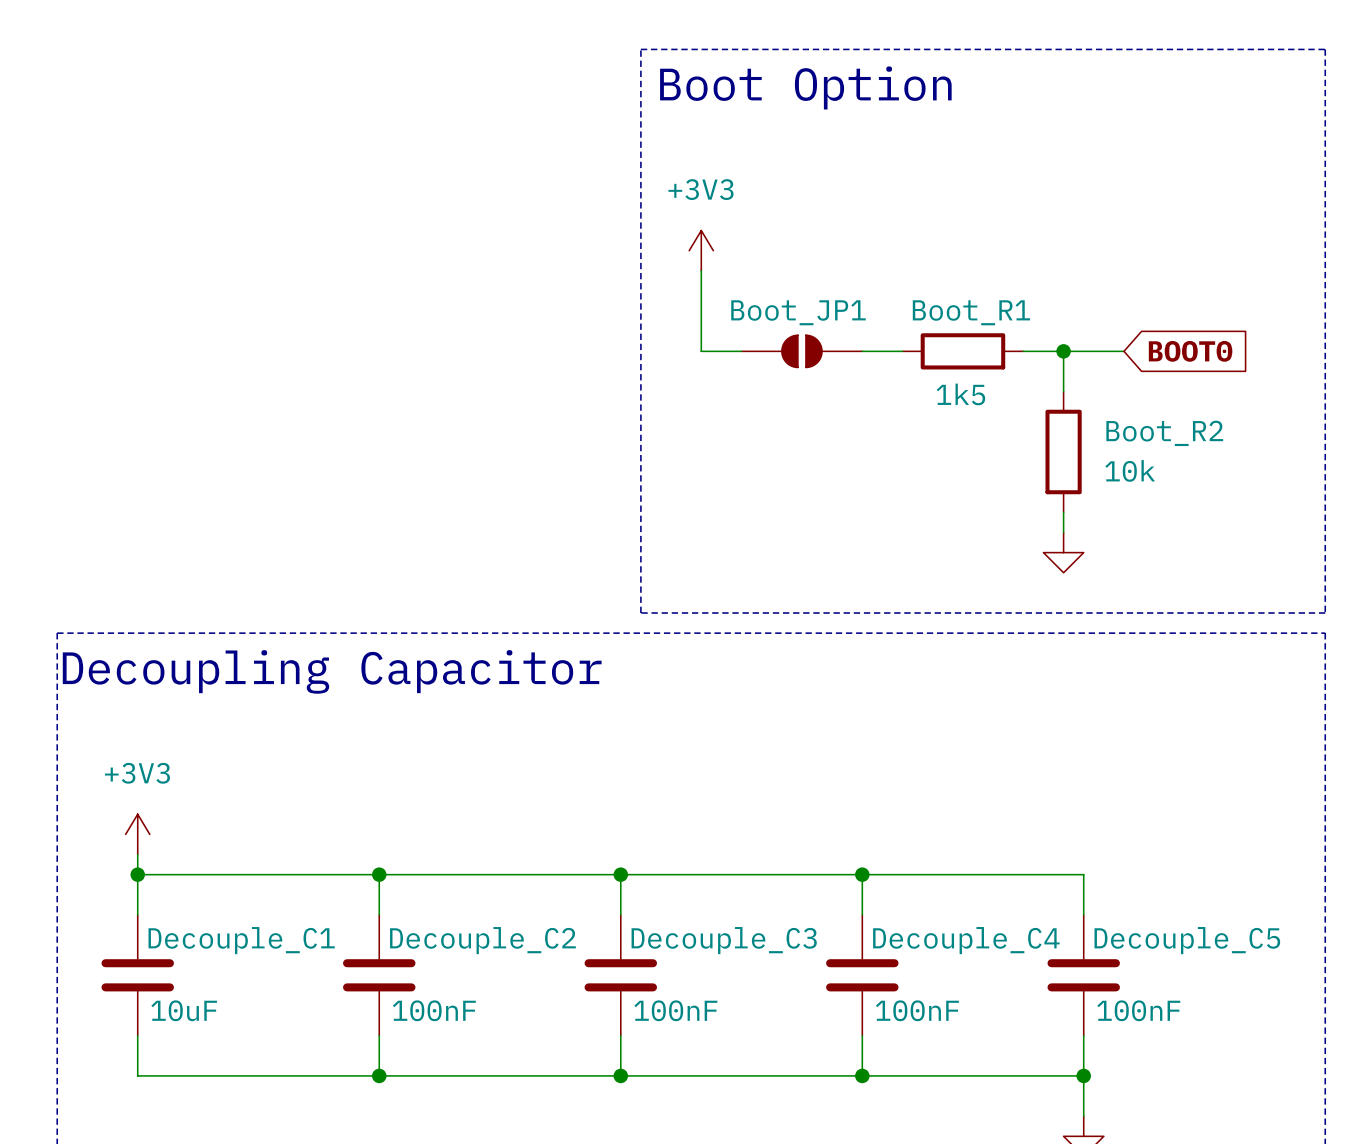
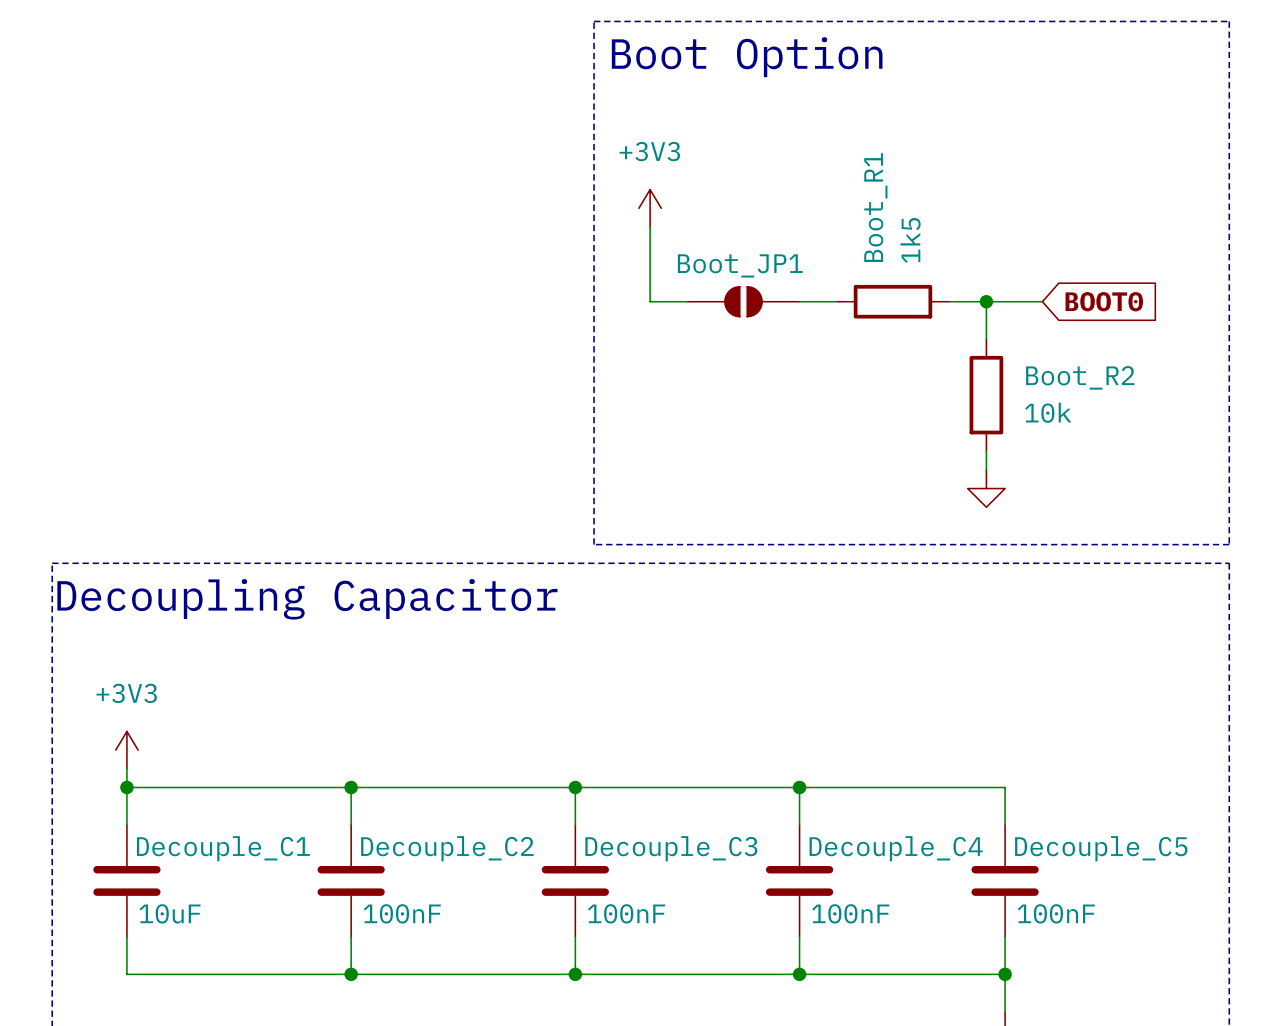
Boot_R1 name rotation: 0° (971, 312) -> 90° counterclockwise (875, 207)
Boot_R1 value rotation: 0° (960, 394) -> 90° counterclockwise (910, 240)
Boot_R1 value position: 1k5 (960, 394) -> 1k5 (910, 240)

